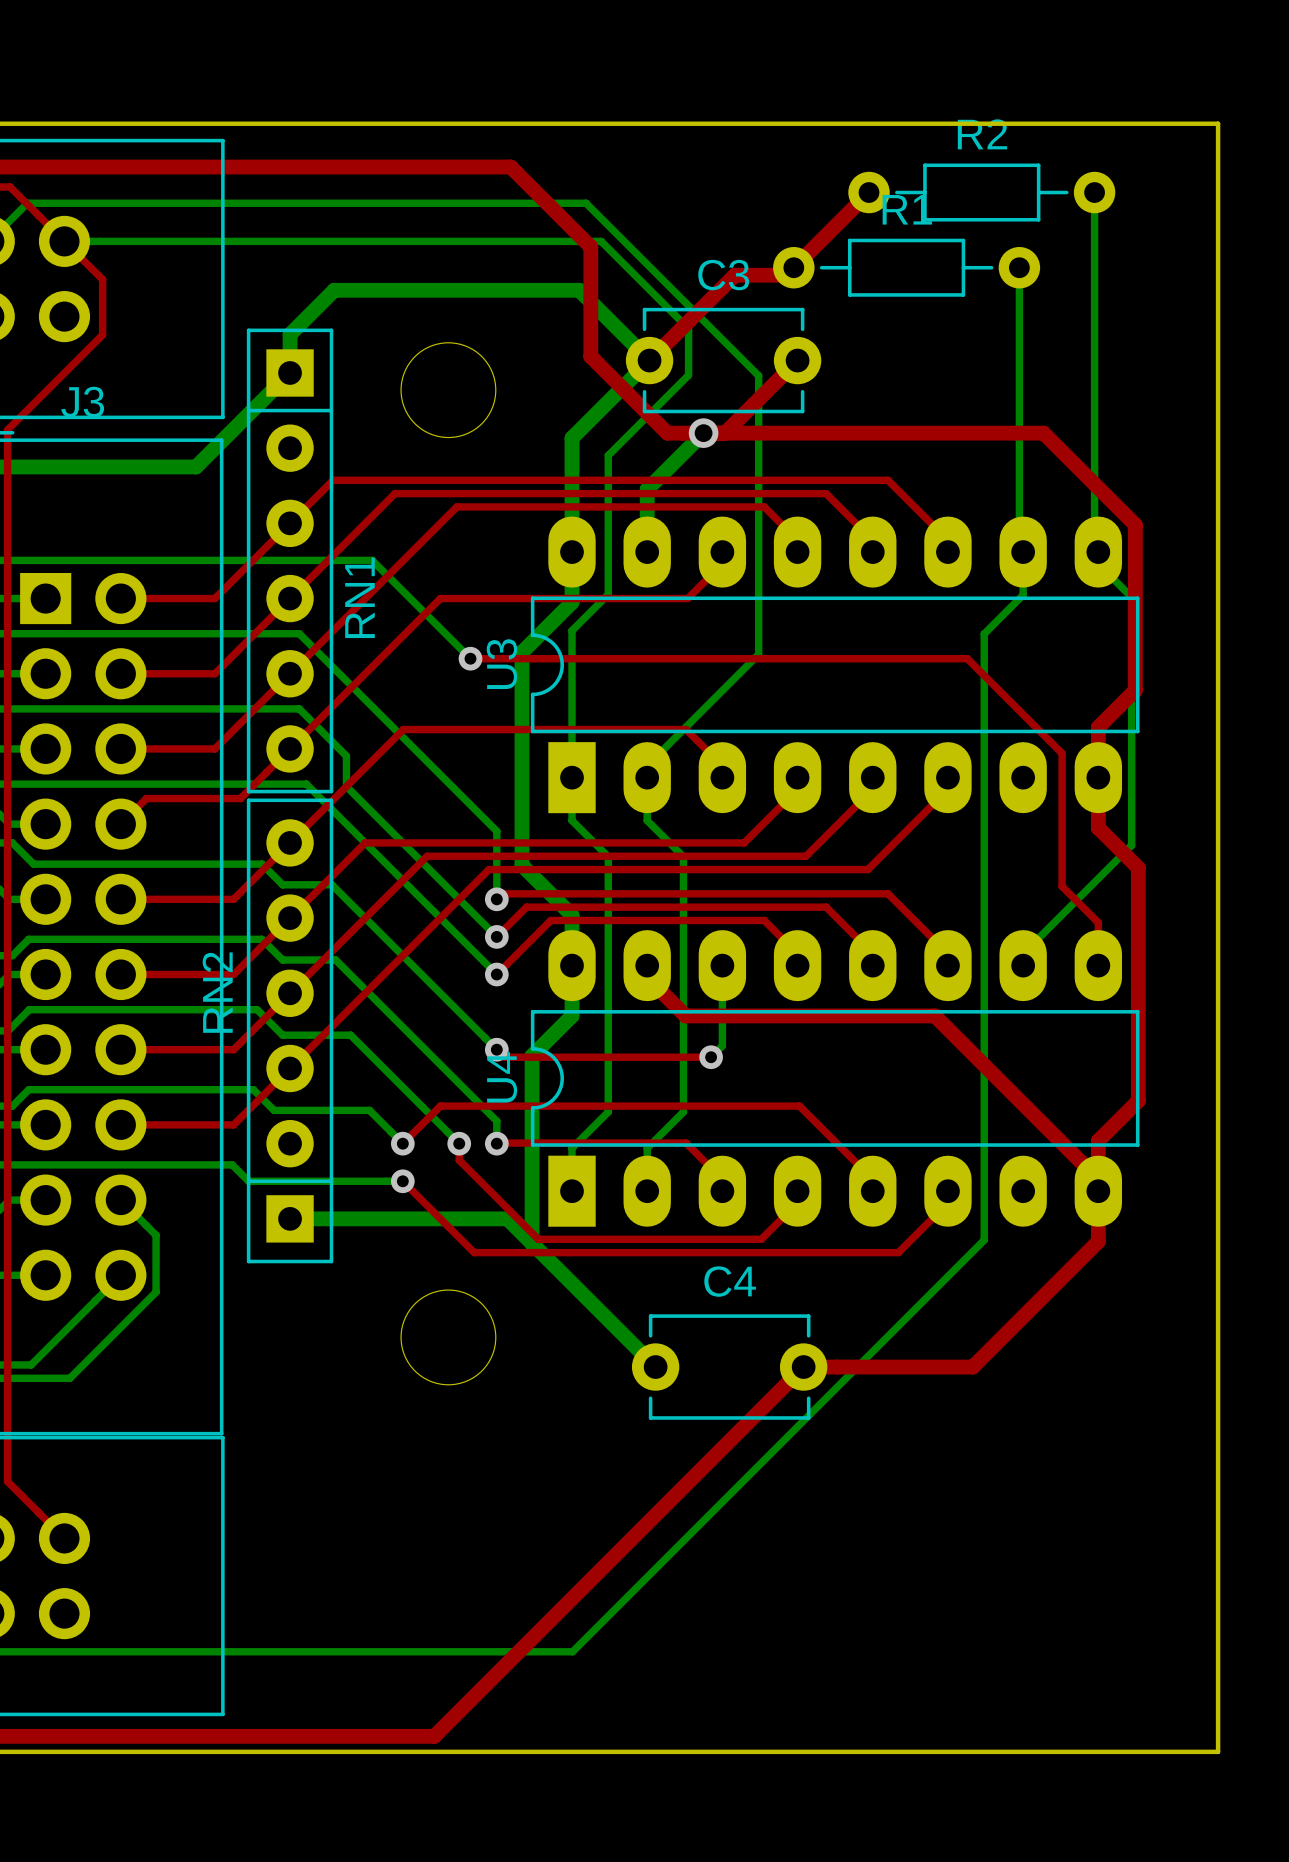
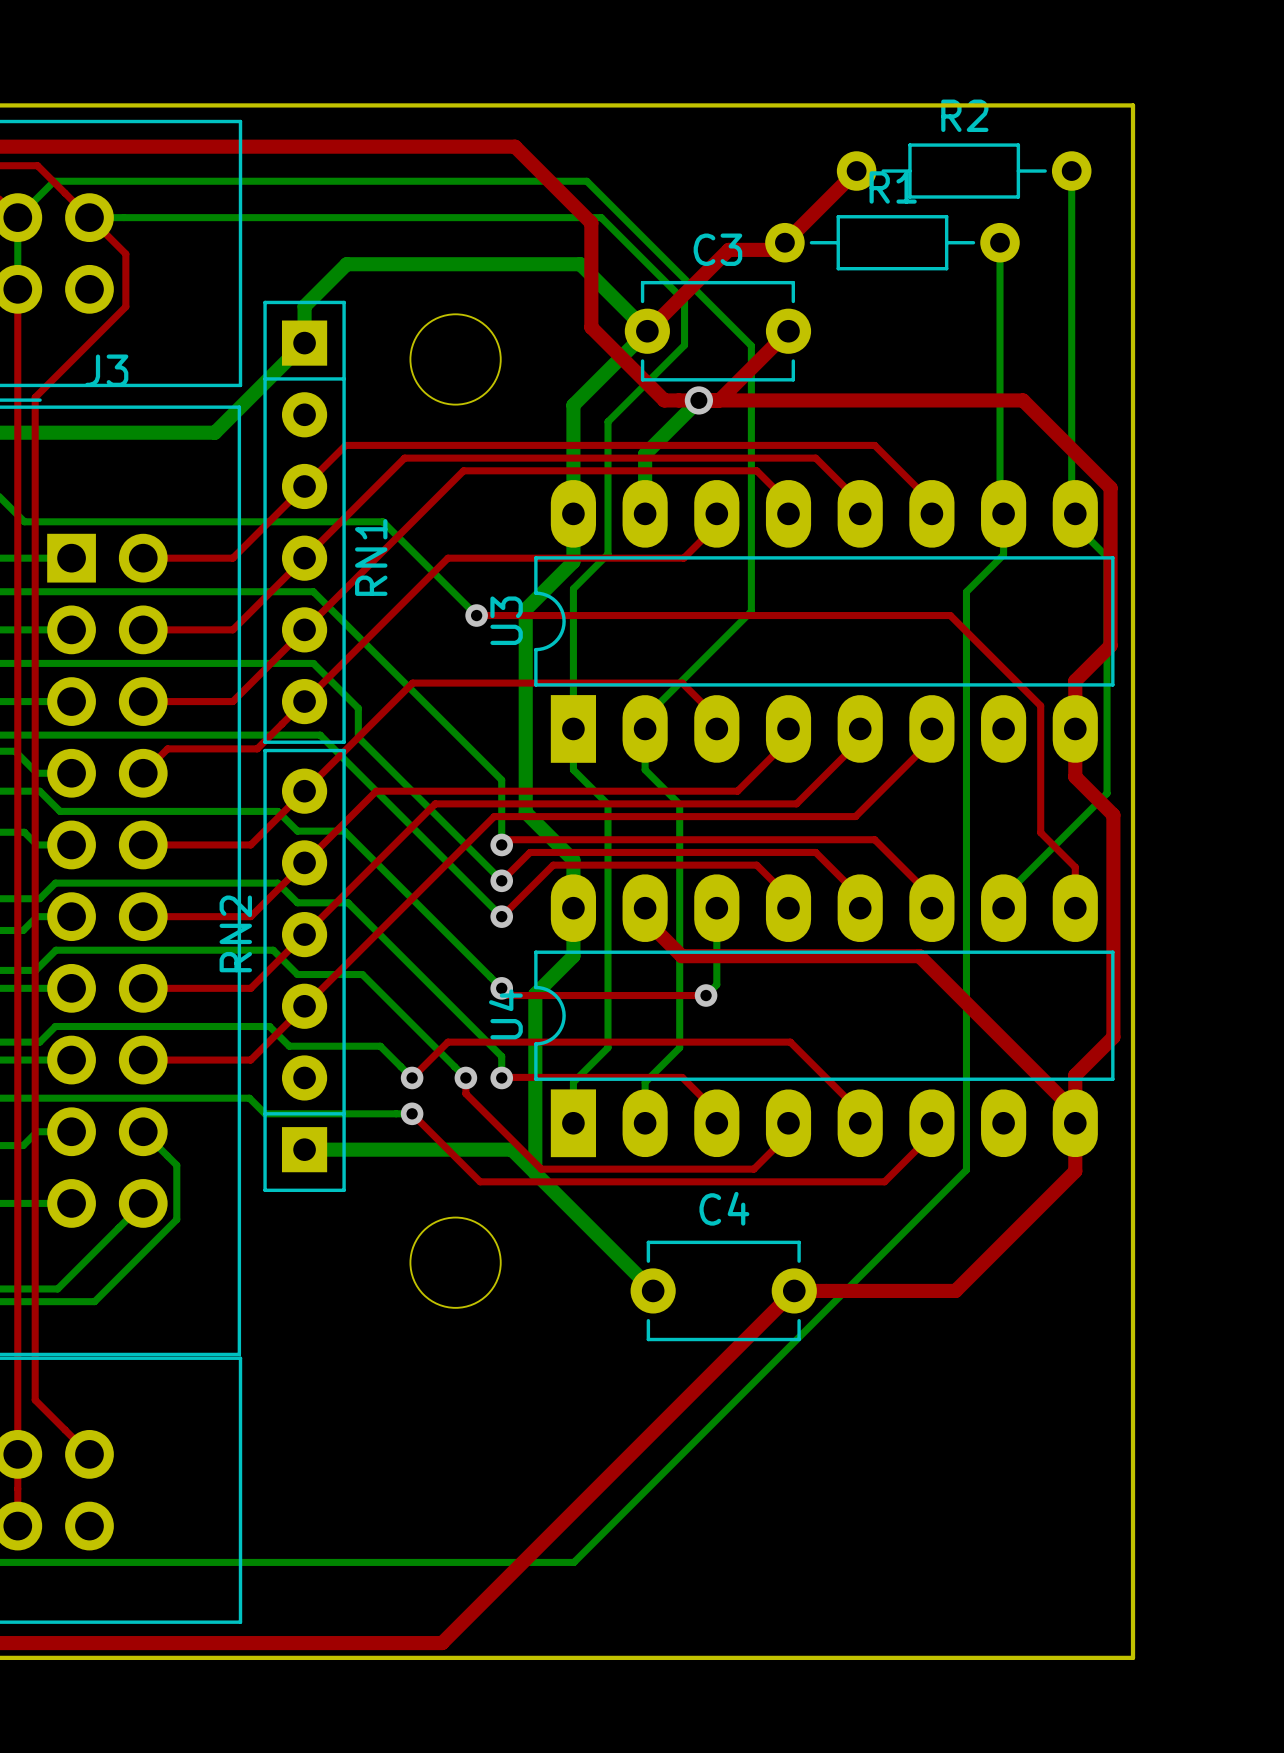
board edge: (1158, 123) (1218, 123) (1218, 1751) (1158, 1751) -> (1133, 105) (1133, 1657)

